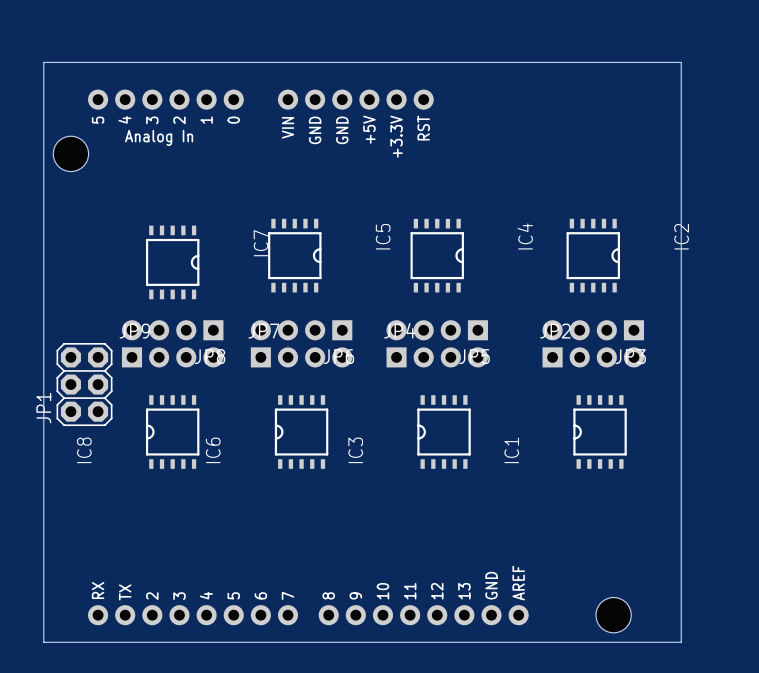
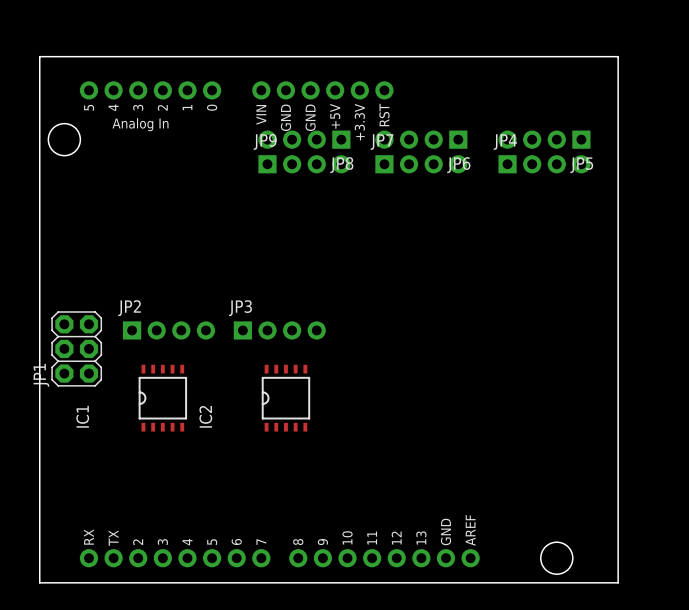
IC5: (294, 255) -> none
IC4: (437, 255) -> none
IC2 rotation: 0° (593, 255) -> 180° (285, 398)
IC2 position: (593, 255) -> (285, 398)
IC7: (172, 262) -> none
JP8 position: (172, 330) -> (304, 139)
JP6 position: (301, 330) -> (421, 139)
JP5 position: (437, 330) -> (544, 139)
JP3 rotation: 0° (593, 330) -> 180° (279, 330)
JP3 position: (593, 330) -> (279, 330)
JP9 position: (172, 357) -> (304, 164)
JP7 position: (301, 357) -> (421, 164)
JP4 position: (437, 357) -> (544, 164)
JP2 position: (593, 357) -> (169, 330)
IC8: (172, 432) -> none
IC6: (301, 432) -> none
IC3: (444, 432) -> none
IC1 position: (600, 432) -> (162, 398)

